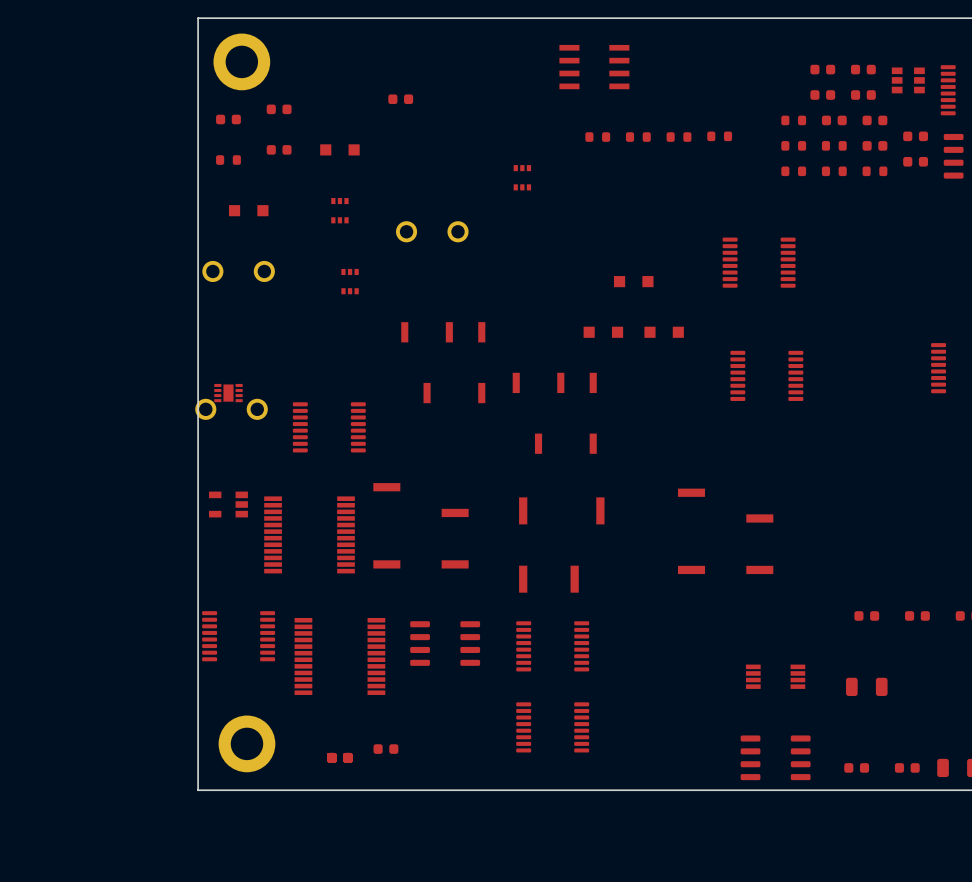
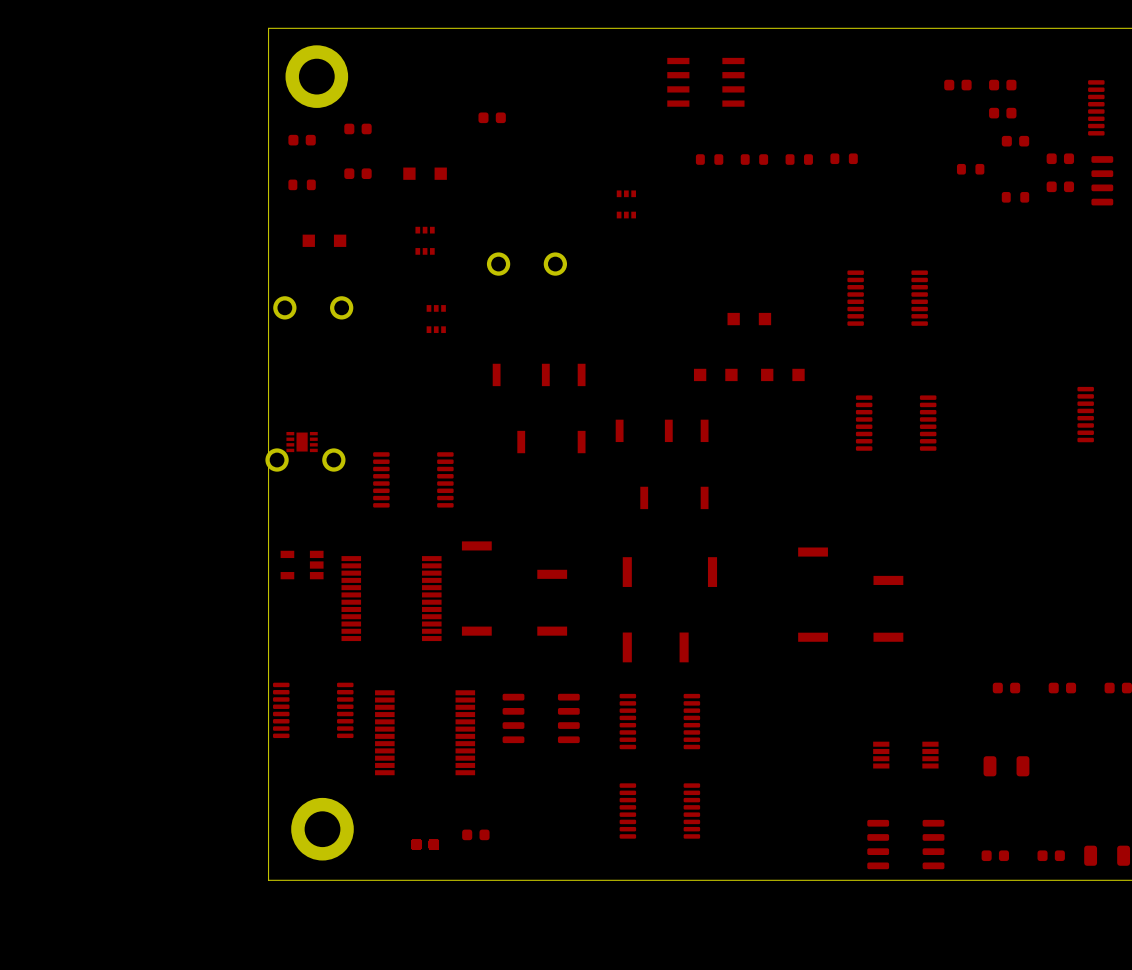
part: (908, 80) -> none
part: (822, 95) -> none
part: (793, 120) -> none
part: (834, 120) -> none
part: (793, 145) -> none
part: (874, 145) -> none
part: (793, 171) -> none
part: (834, 171) -> none

